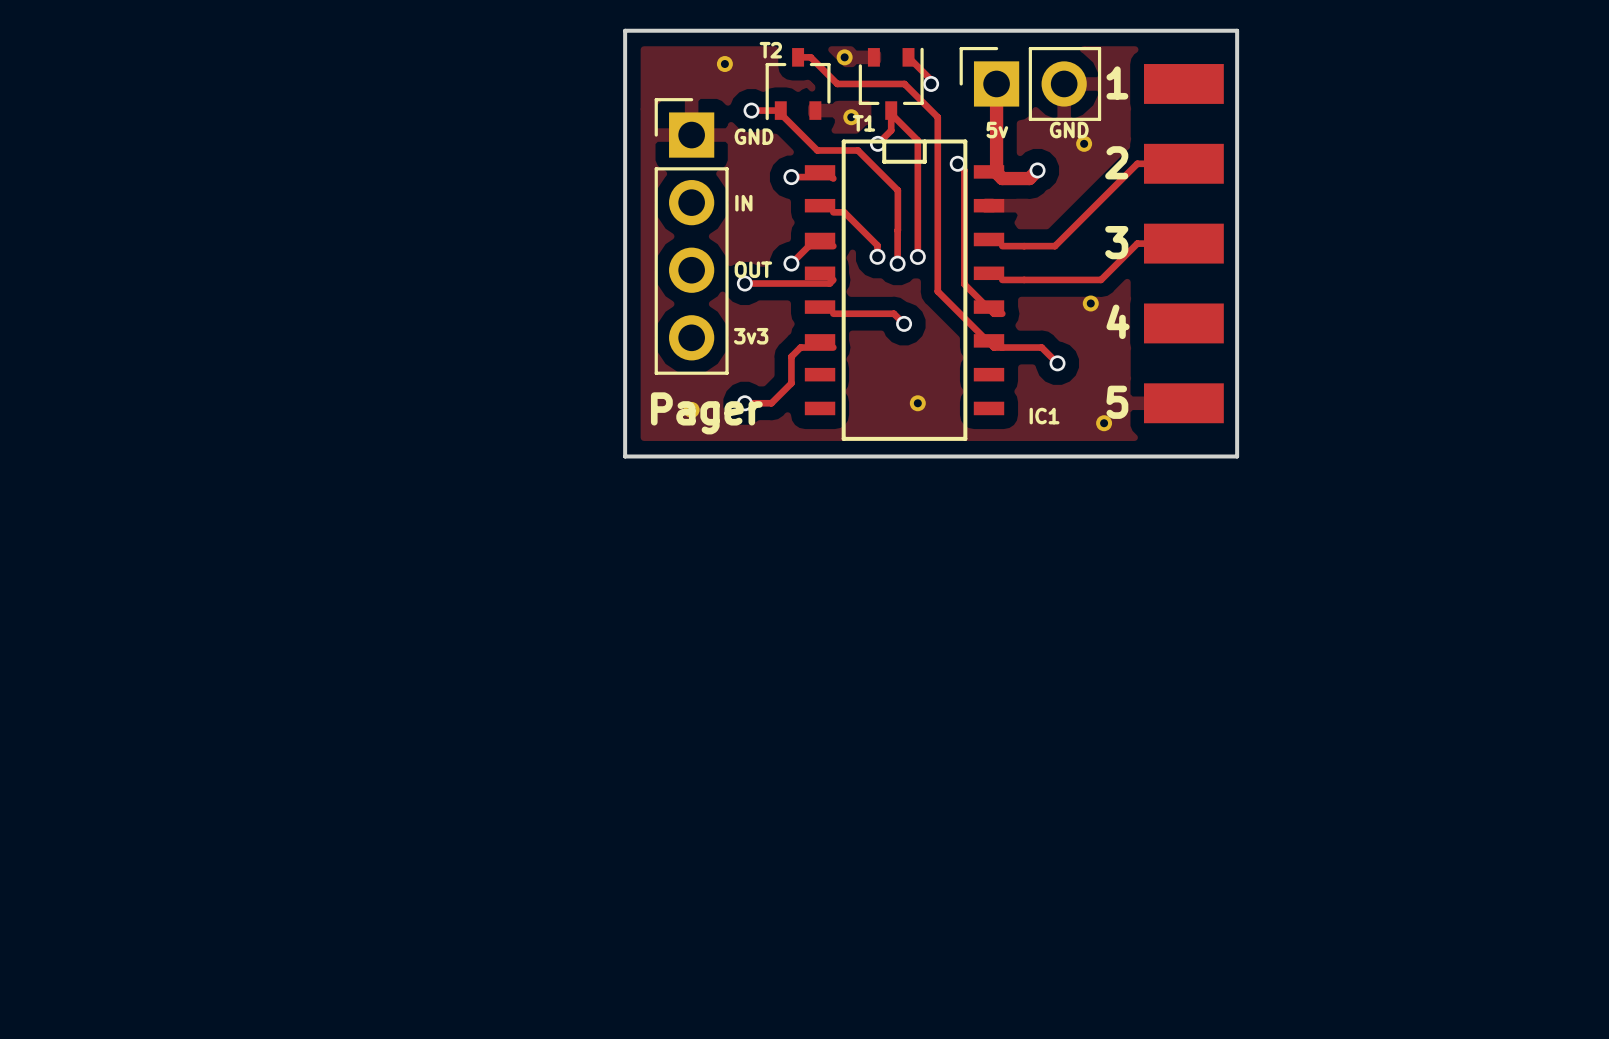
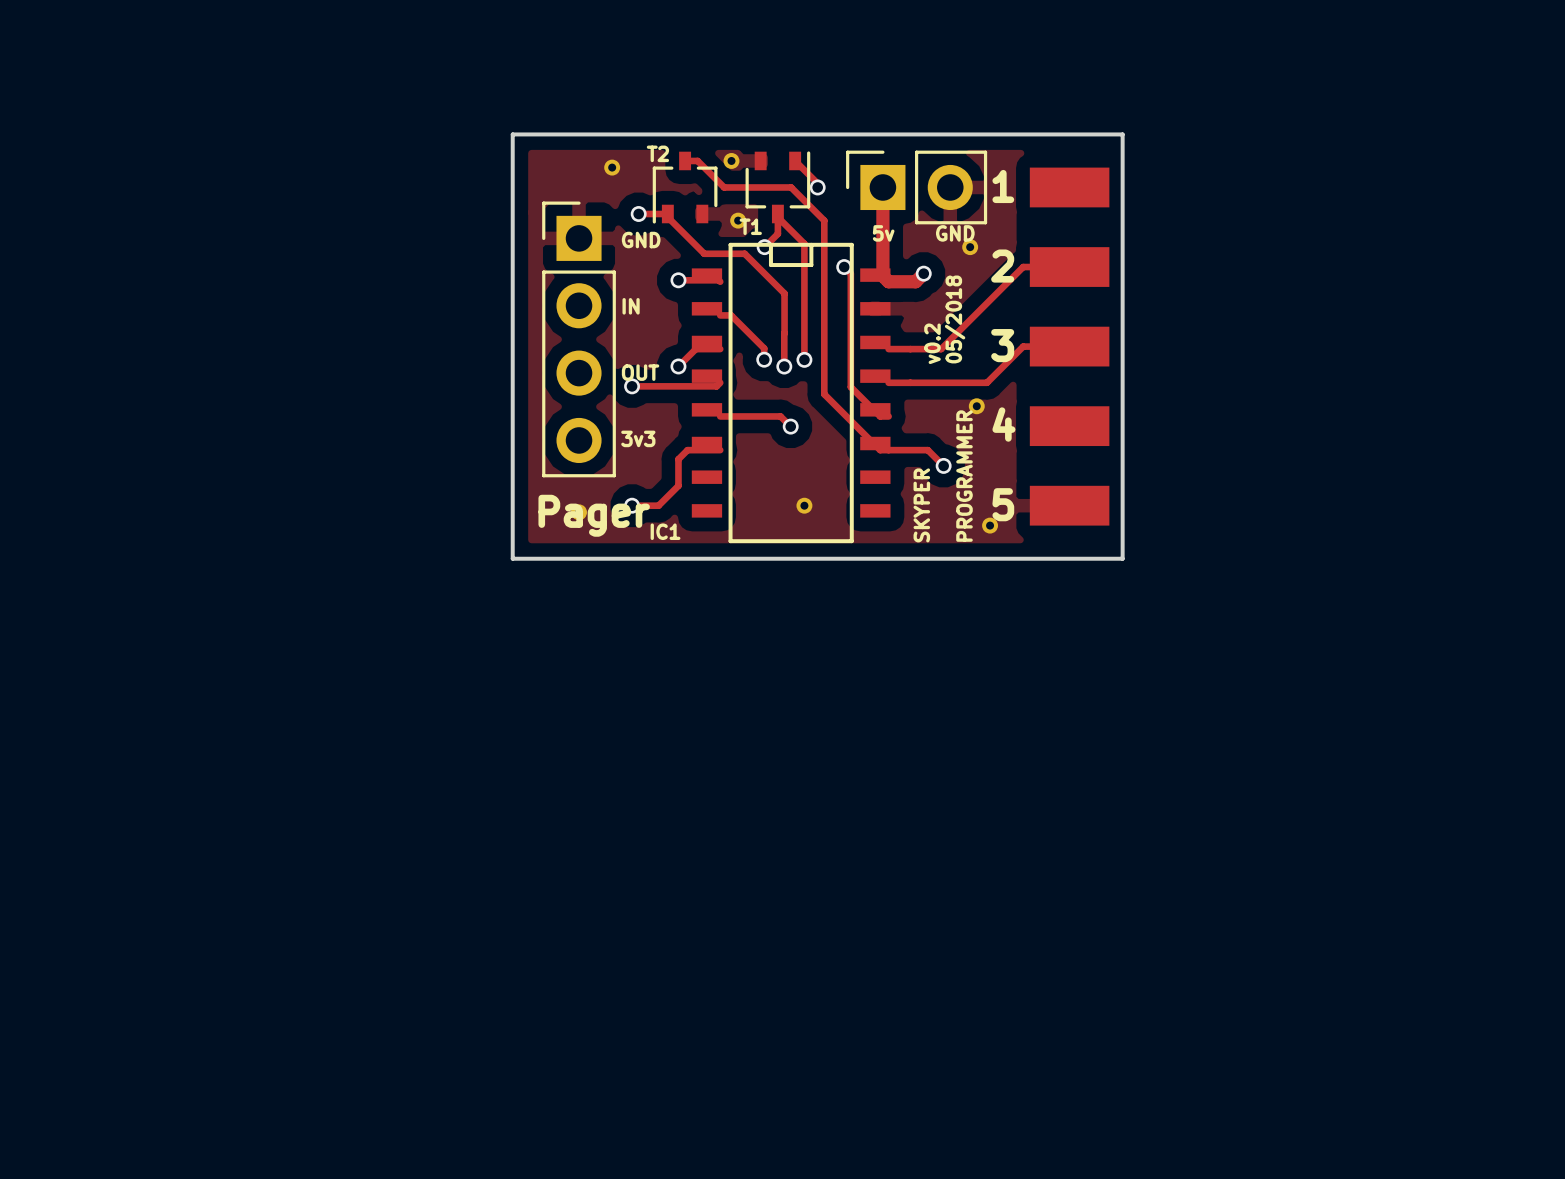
text: none -> 05/2018 (955, 319)
text: none -> v0.2 (932, 343)
text: none -> PROGRAMMER (964, 476)
text: none -> SKYPER (921, 505)
IC1 name position: IC1 (1044, 416) -> IC1 (665, 531)

